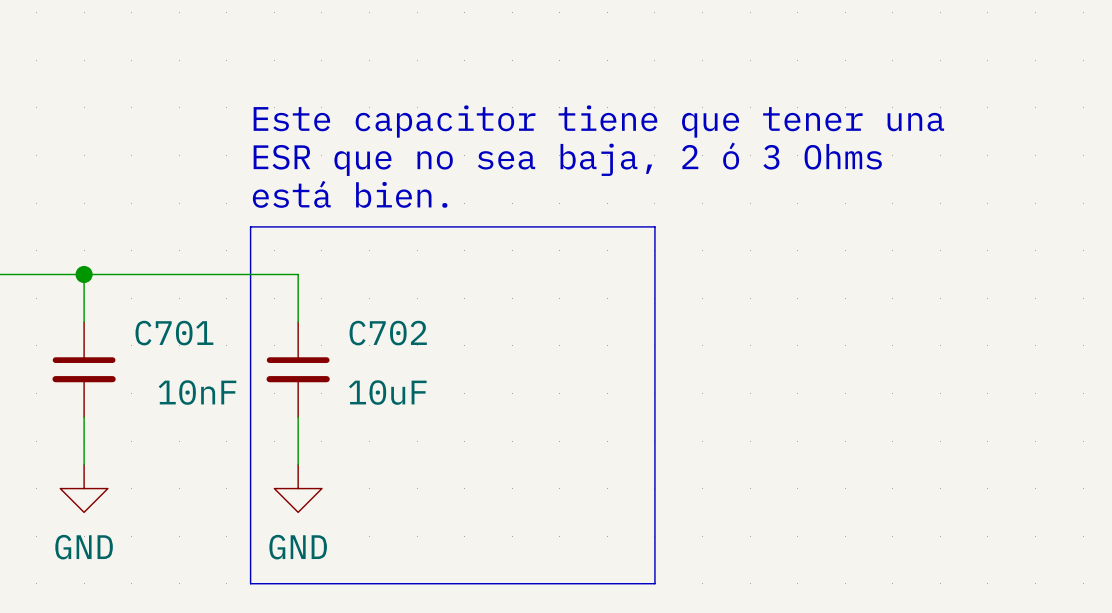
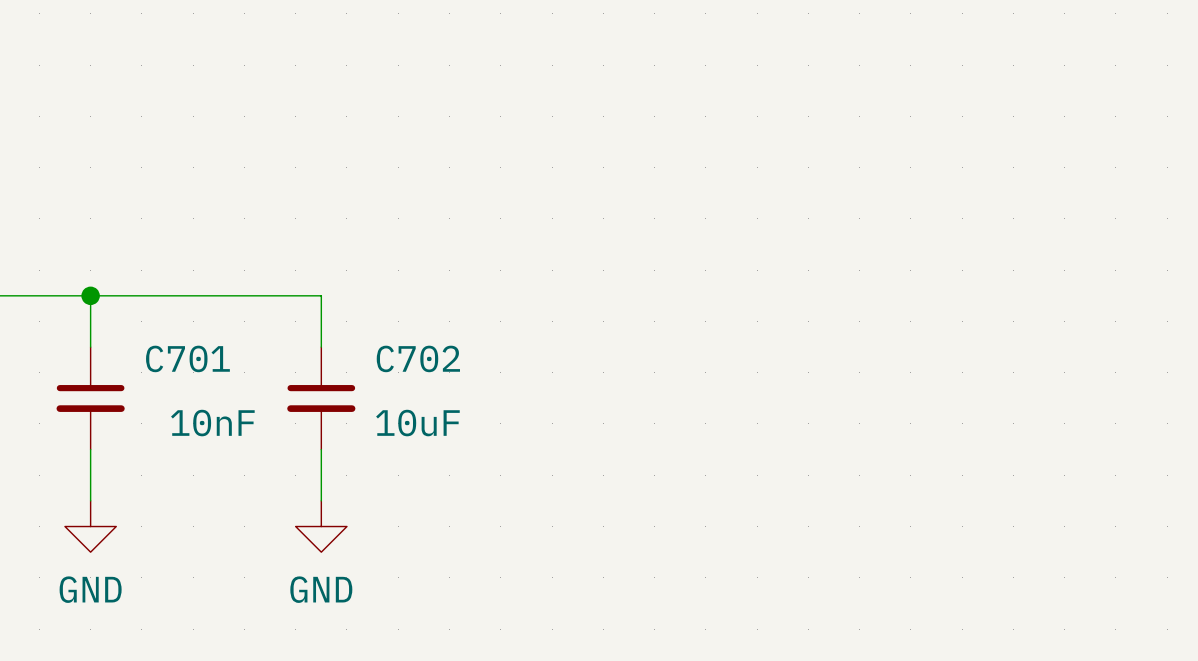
text: Este capacitor tiene que tener una (598, 121) -> none
text: ESR que no sea baja, 2 ó 3 Ohms (567, 159) -> none
text: está bien. (350, 194) -> none
line: (250, 226) (250, 583) (654, 583) (654, 226) (250, 226) -> none

